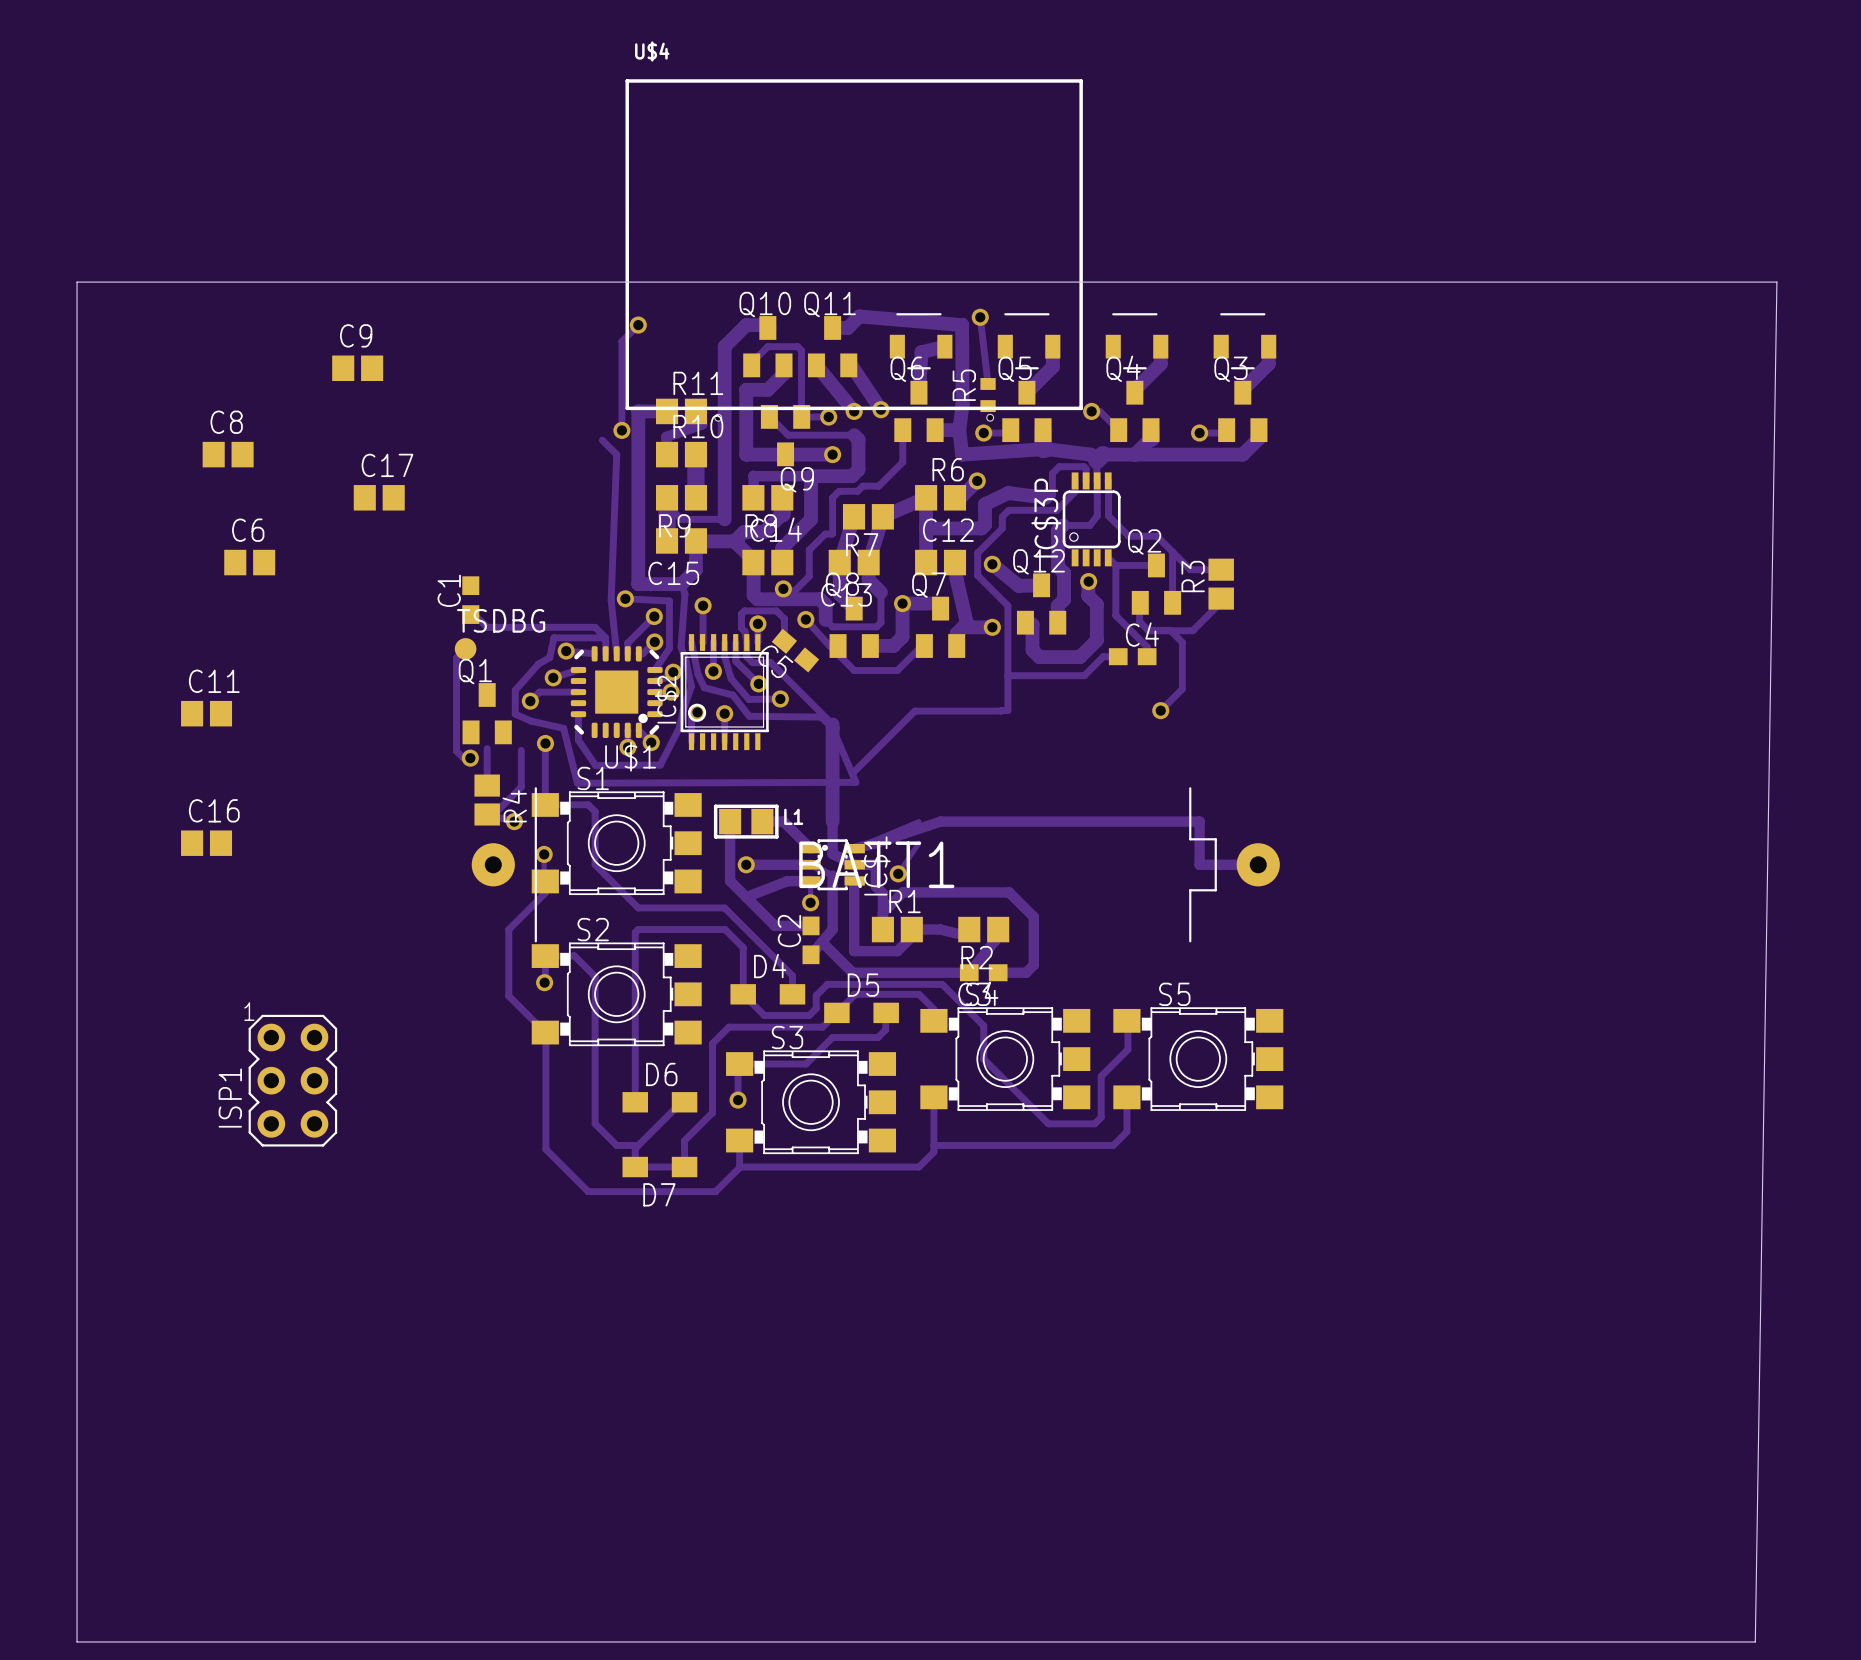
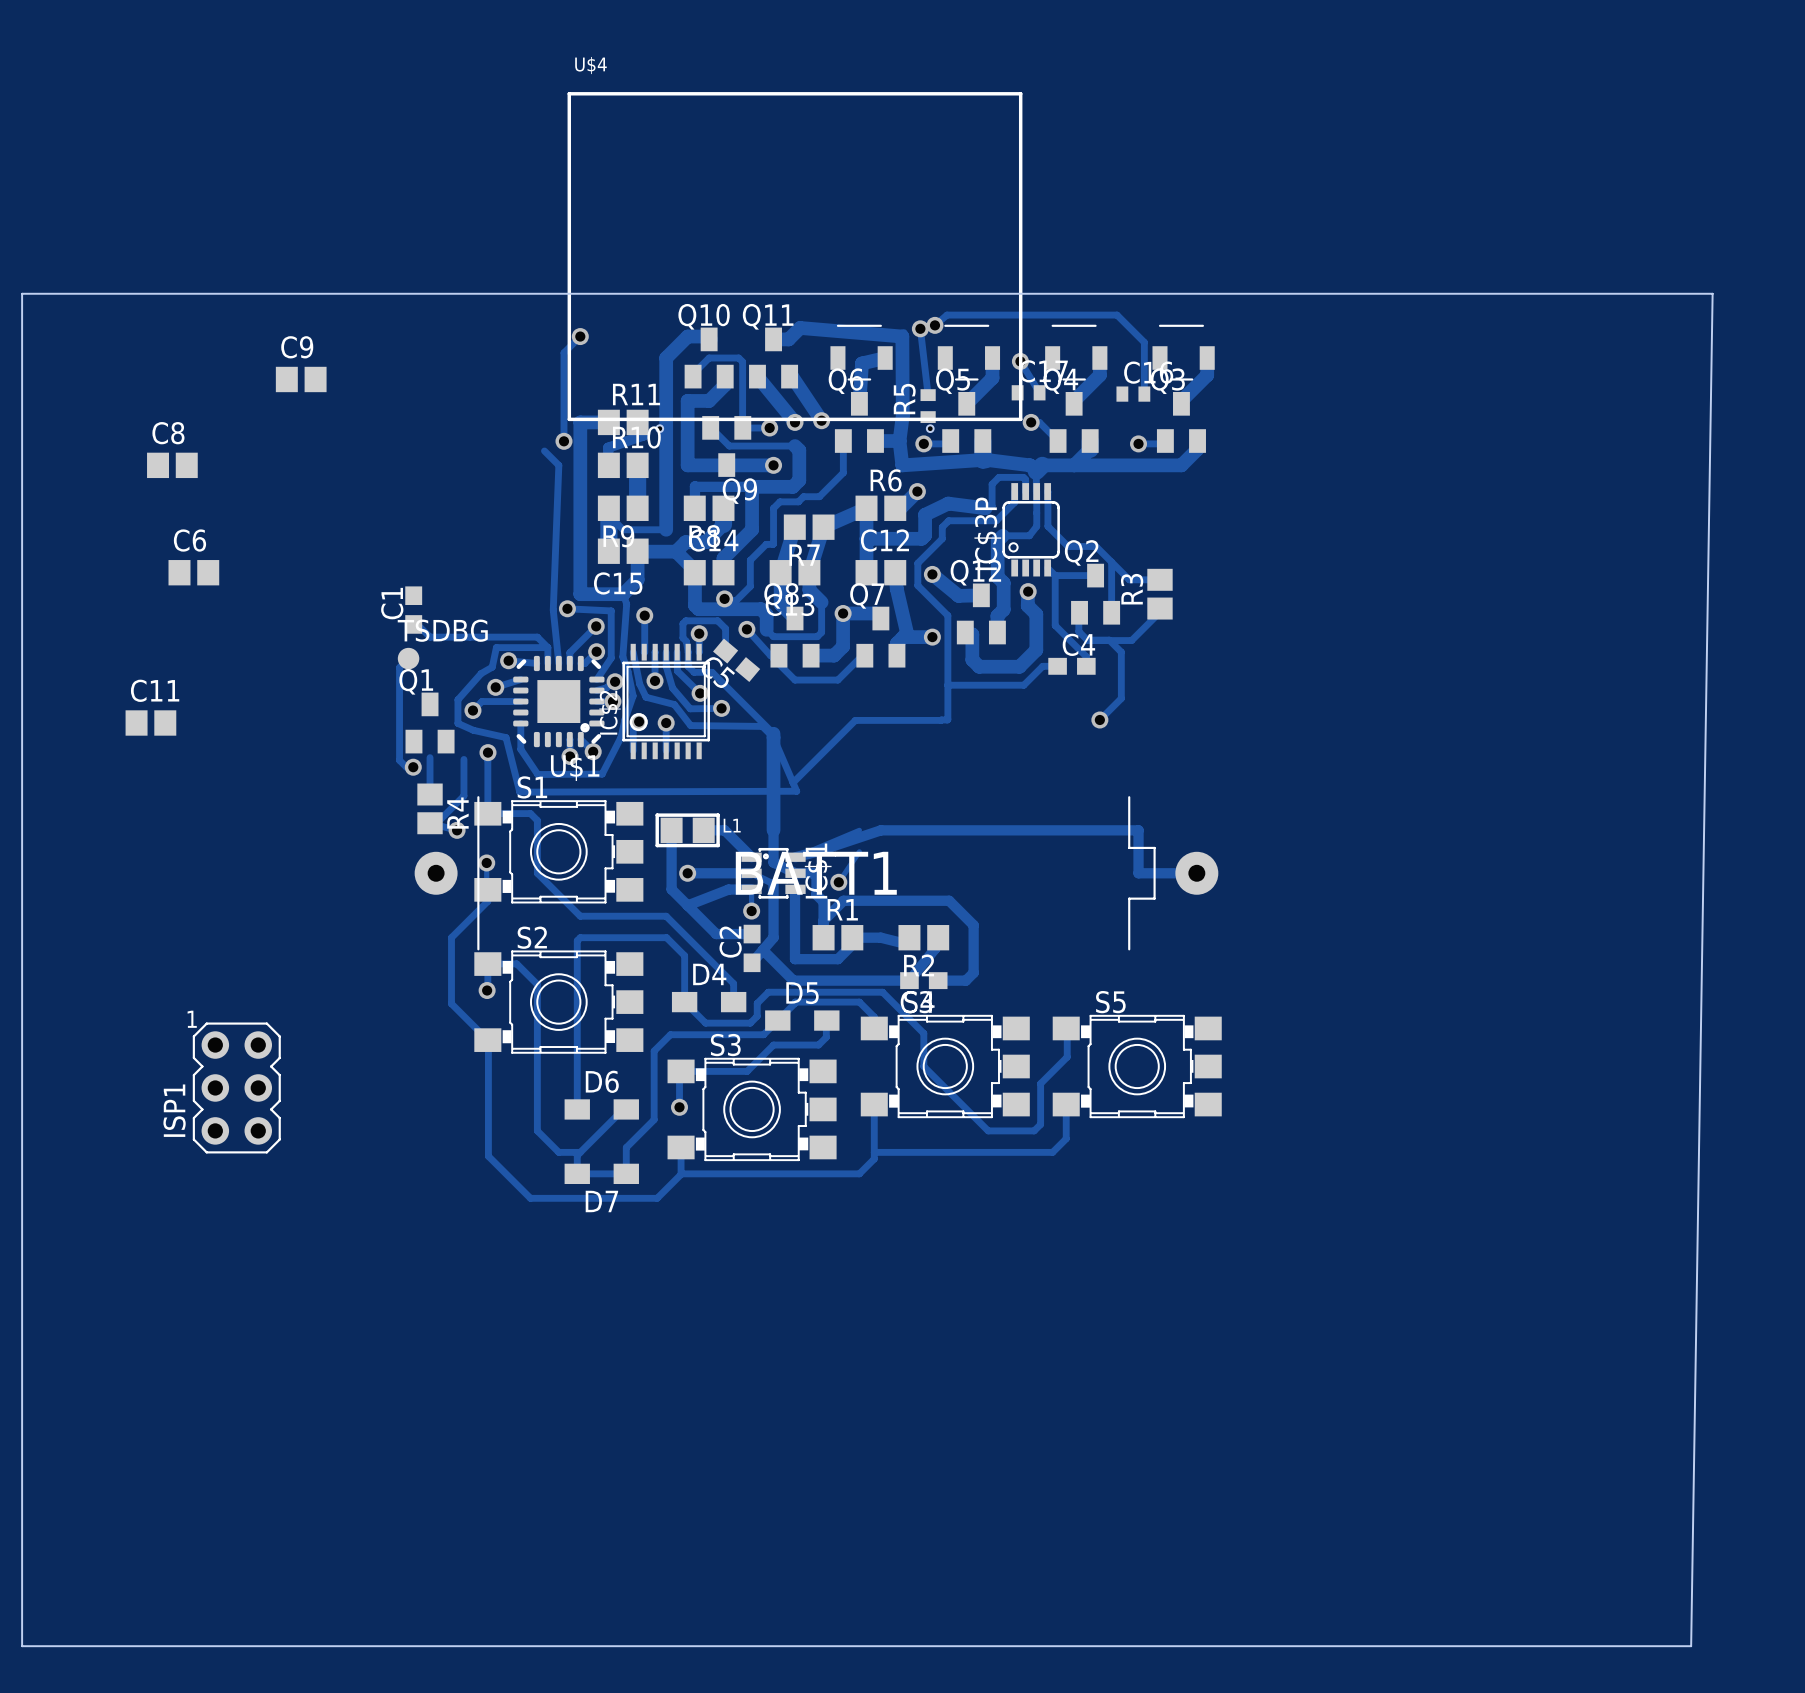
track: none -> (934, 325) (947, 315) (1117, 315) (1144, 342) (1144, 394)
via: none -> (934, 325)
track: none -> (1020, 361) (1039, 392)
via: none -> (1020, 361)
C17 footprint: [353, 485, 405, 511] -> [1011, 385, 1046, 401]
C16 footprint: [181, 830, 233, 856] -> [1116, 386, 1151, 402]

